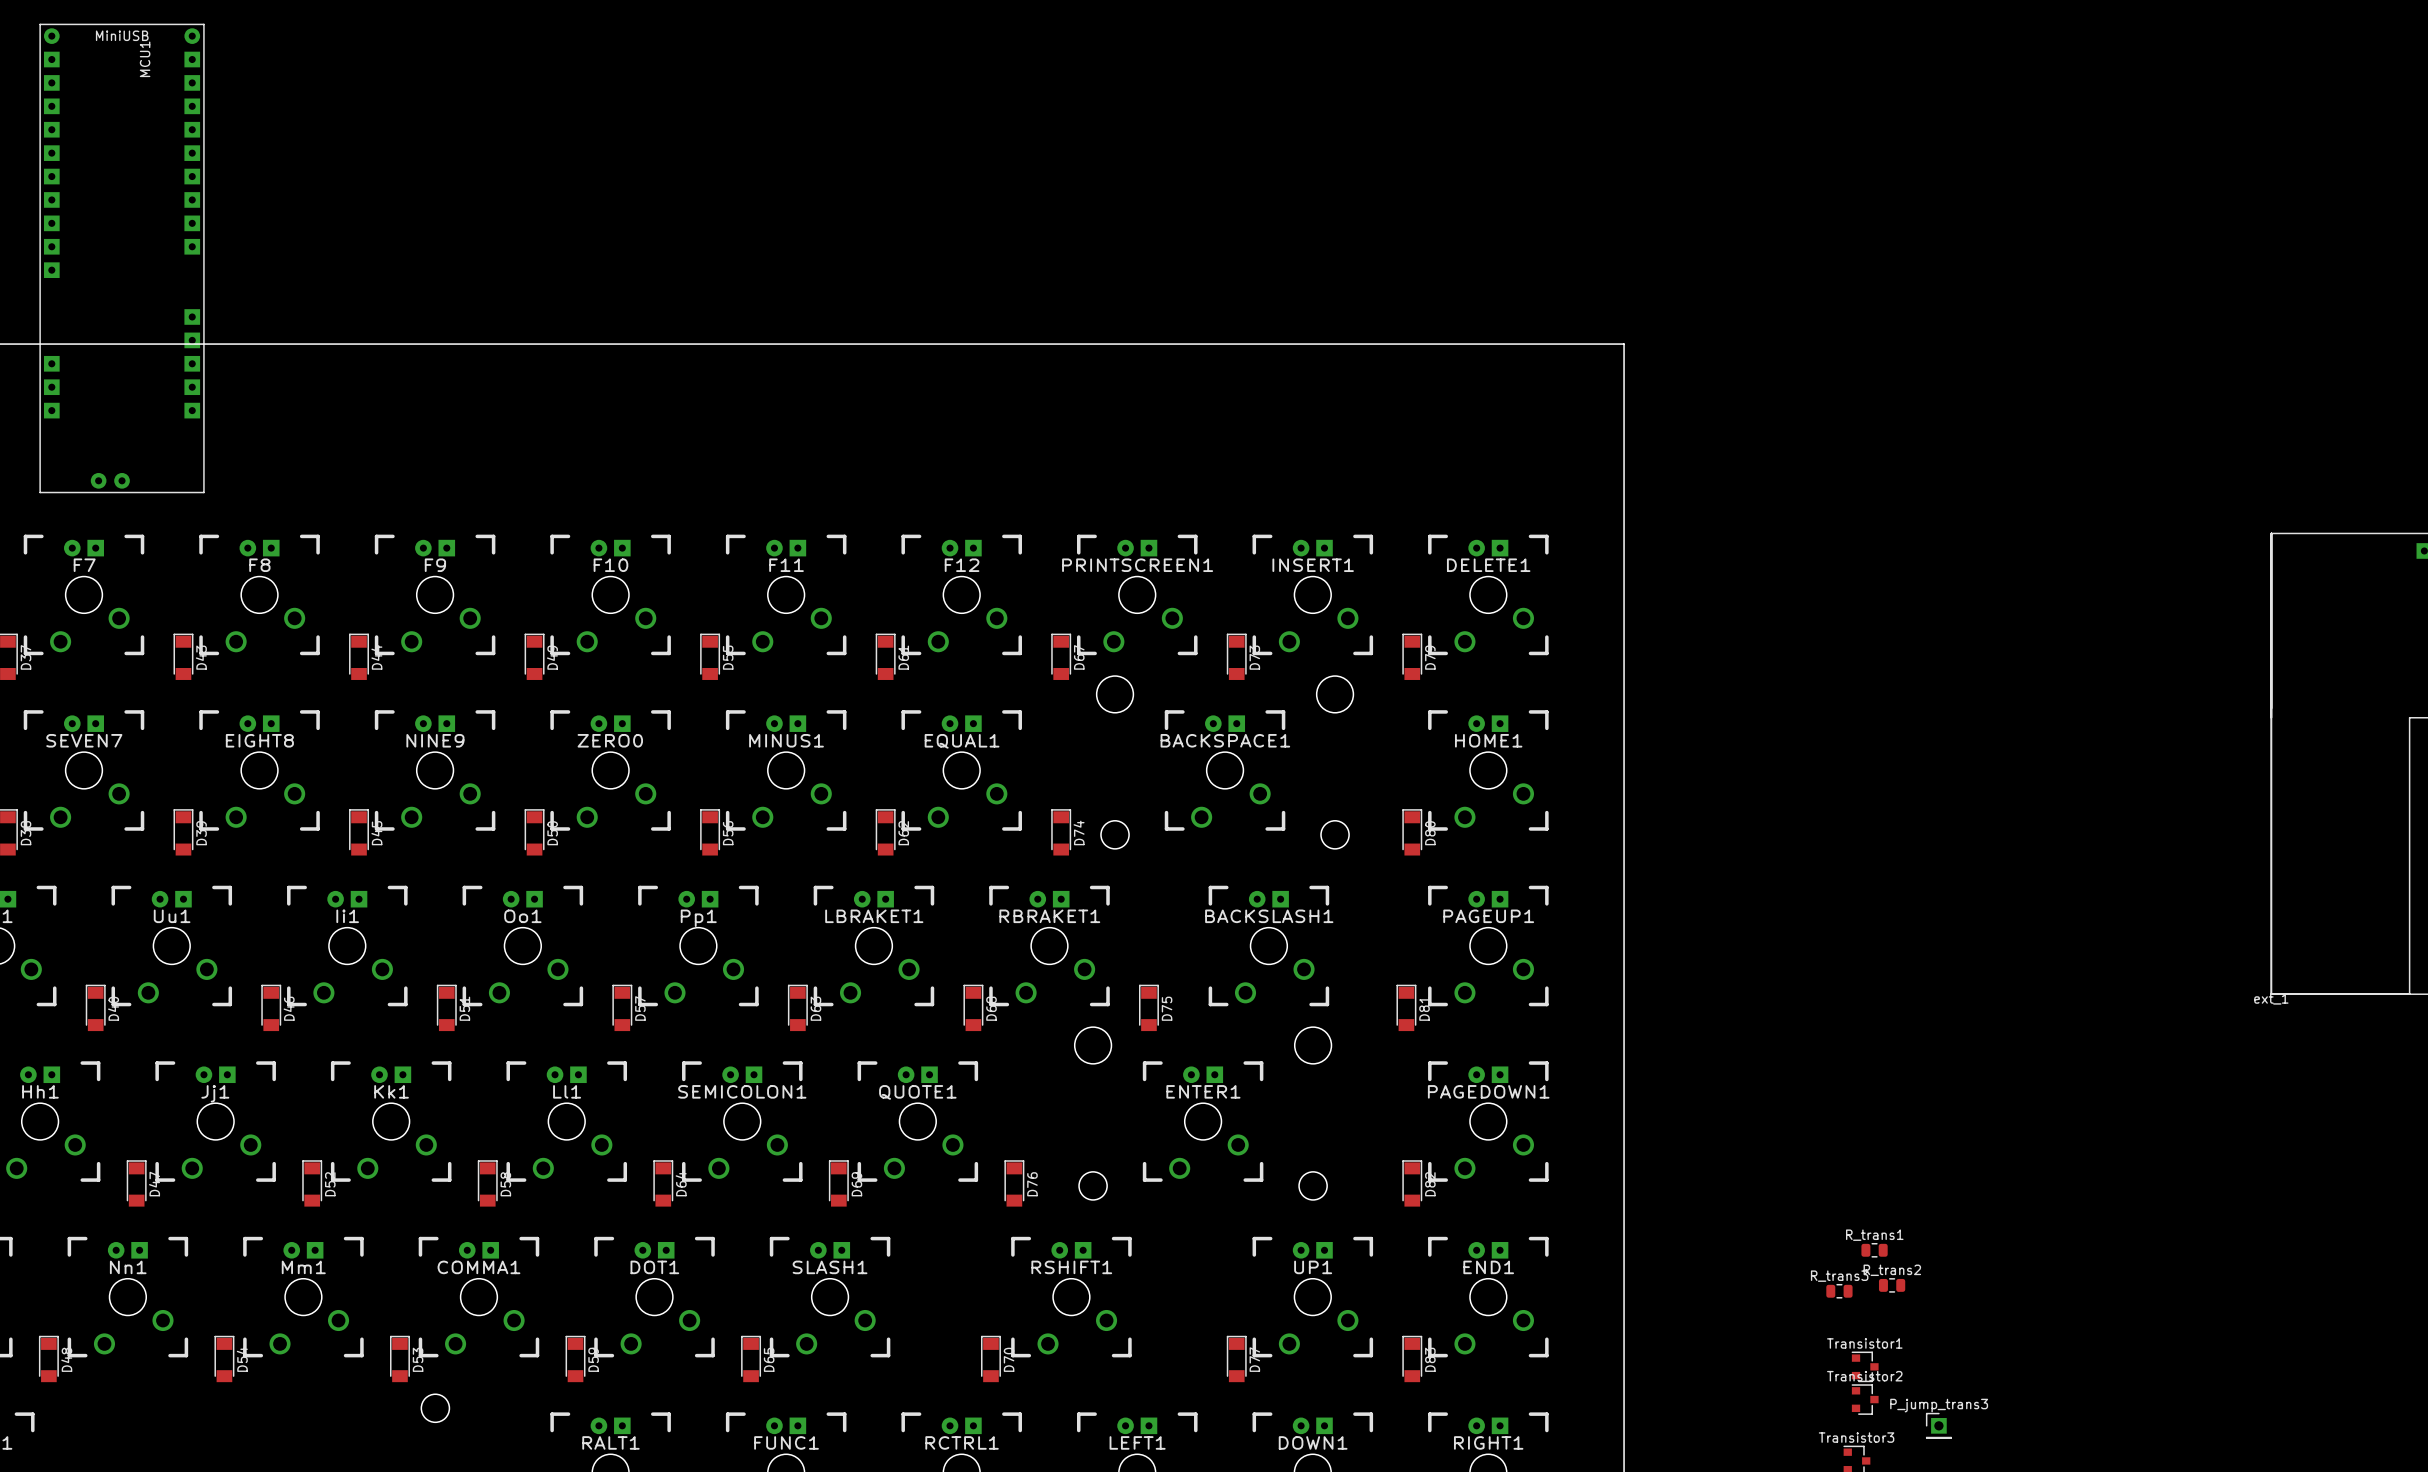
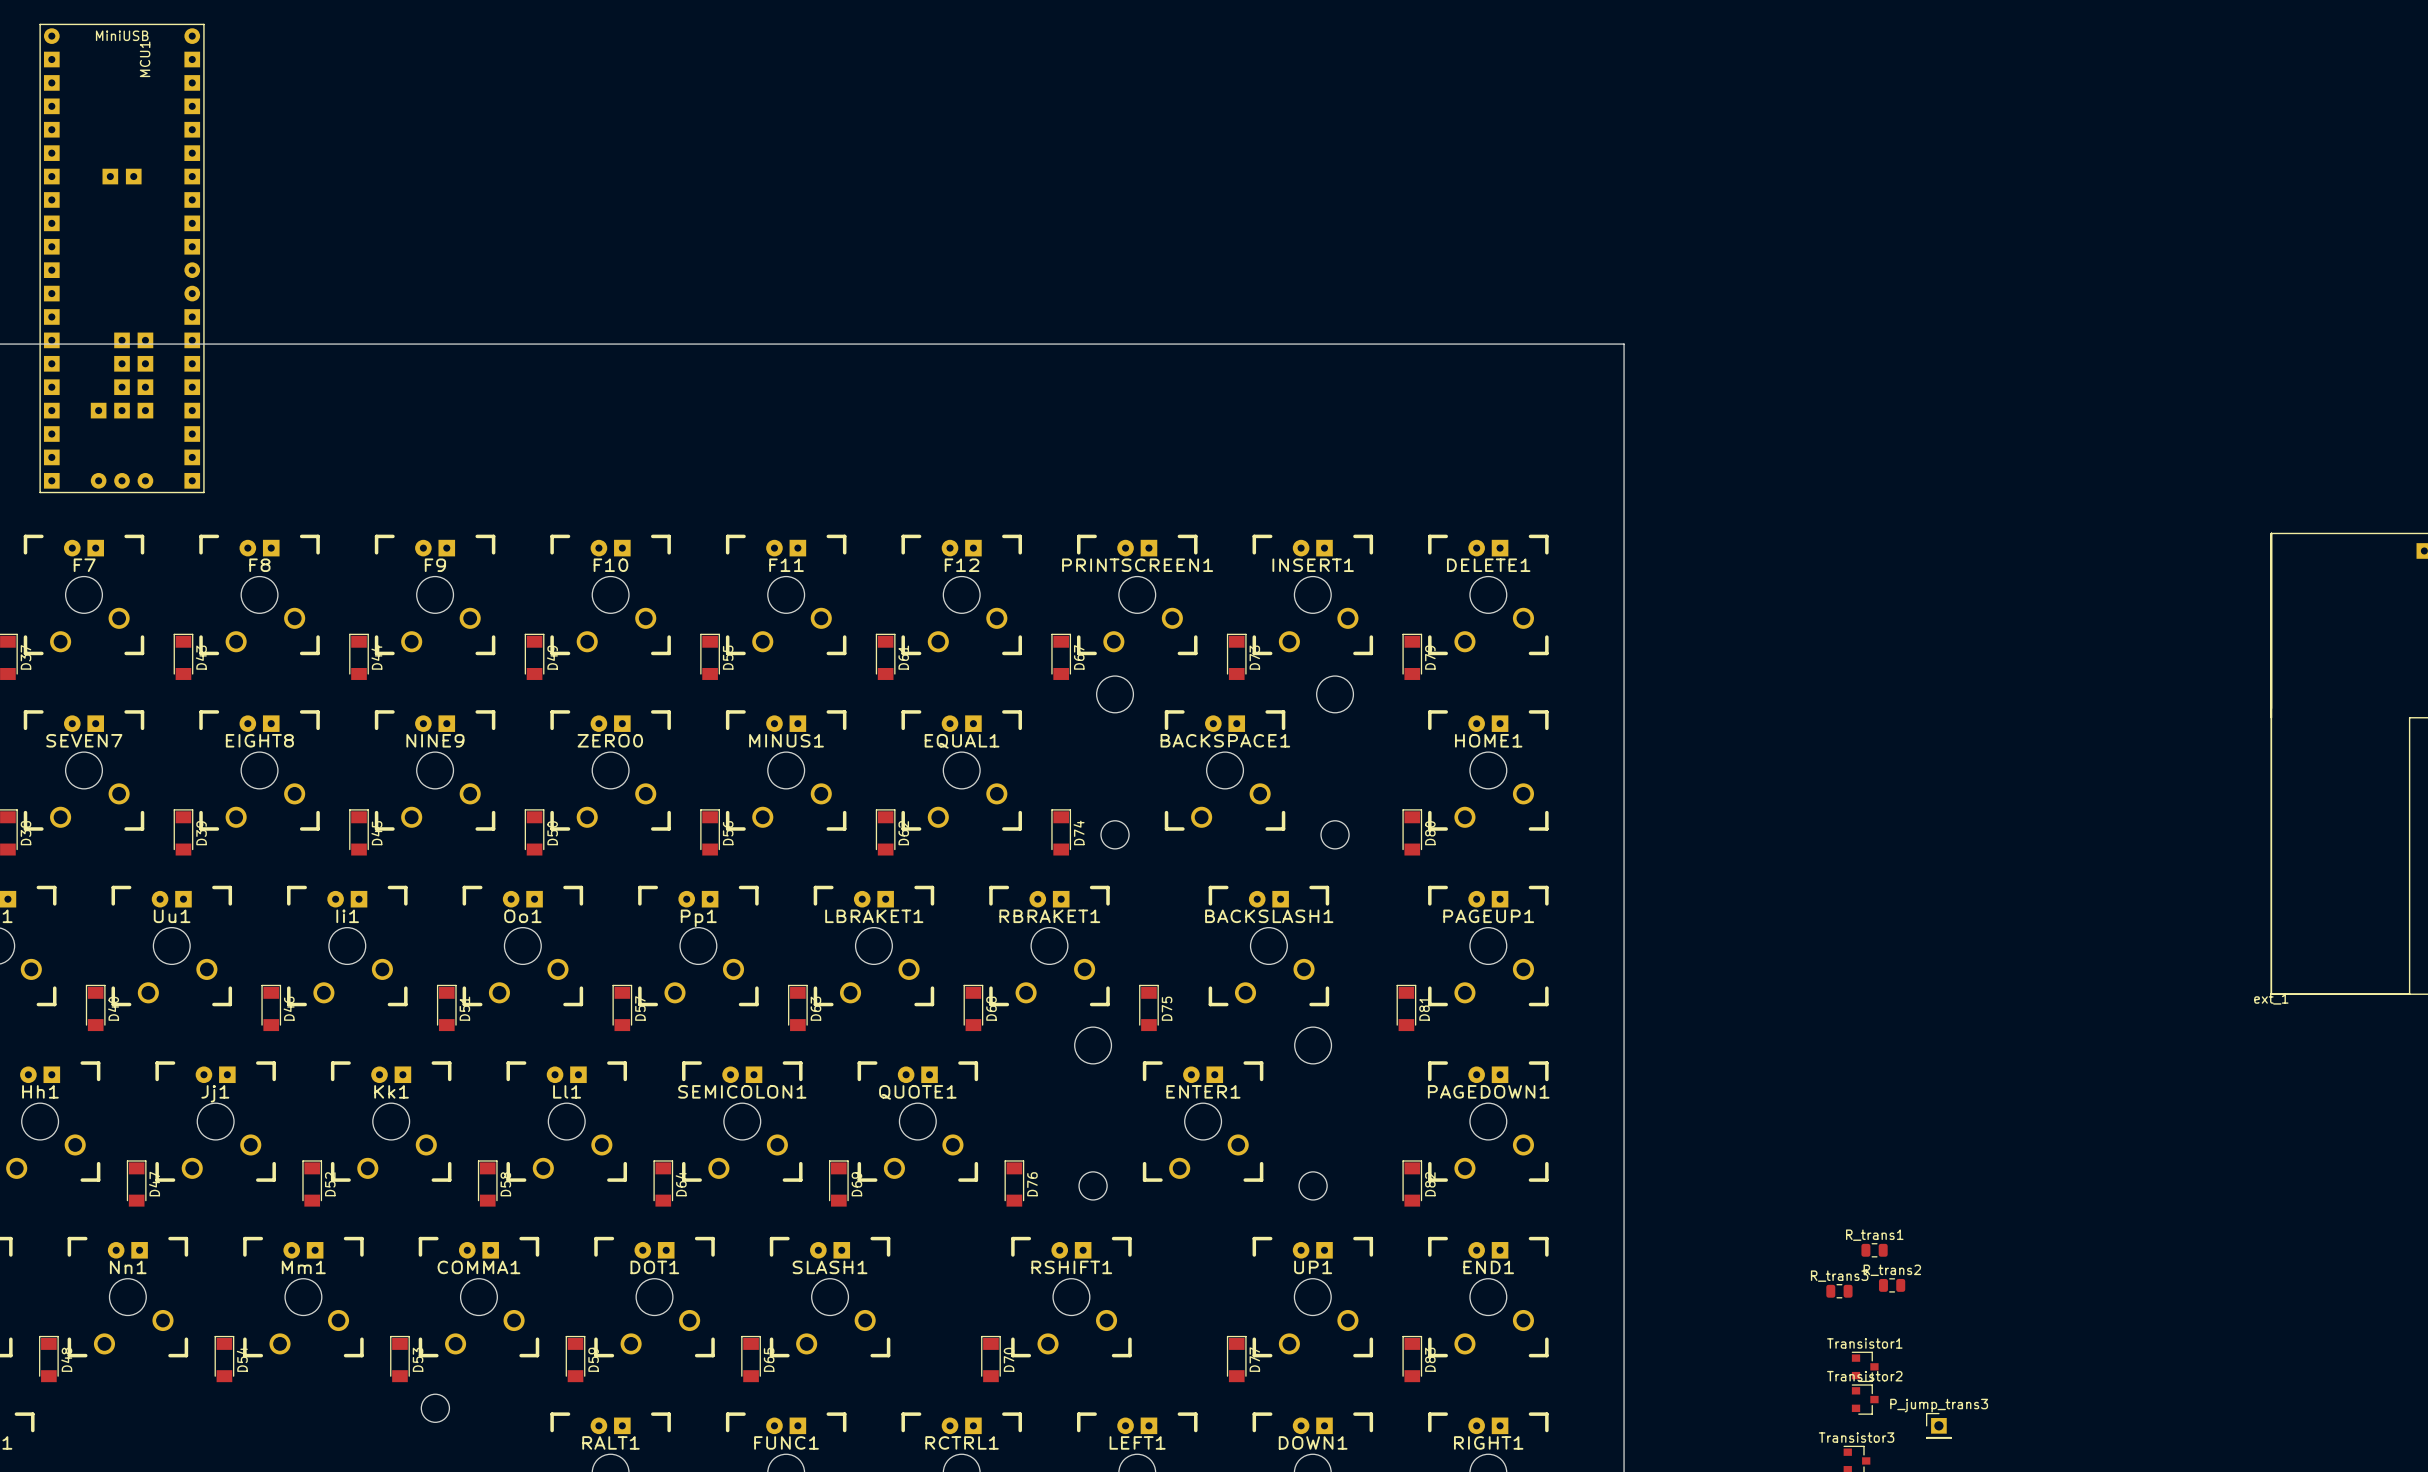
MCU1 footprint: [39, 23, 205, 494] -> [39, 23, 205, 494]

